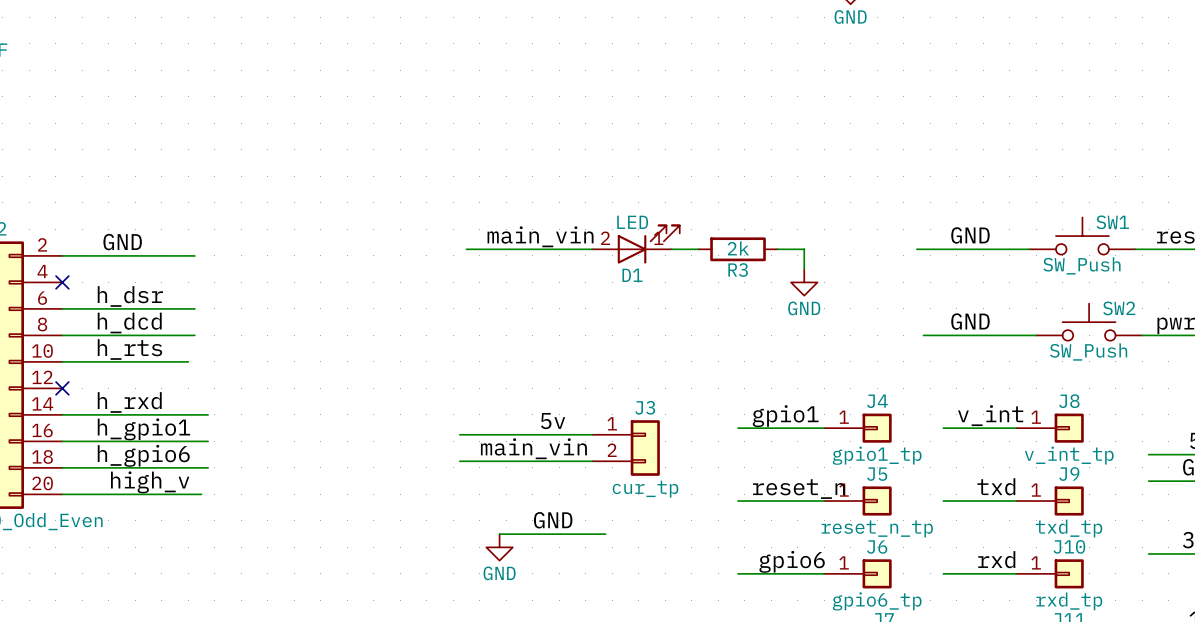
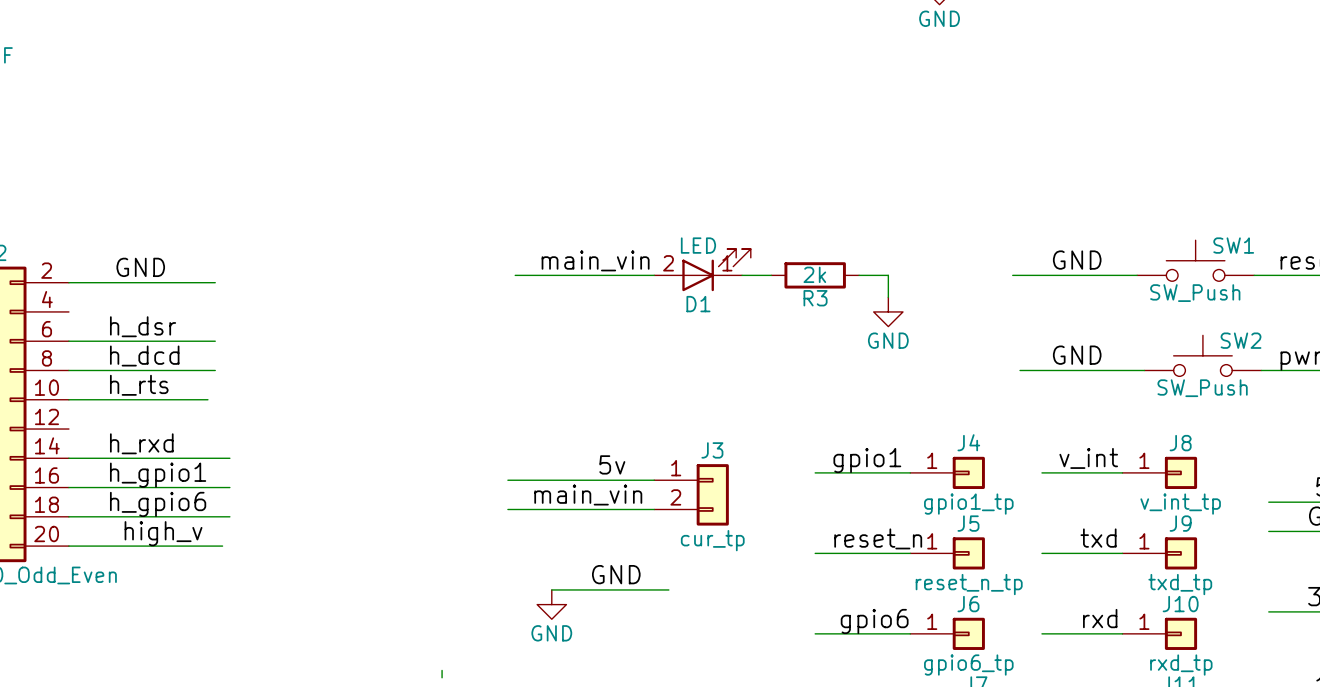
no-connect mark: (62, 282) -> none
no-connect mark: (62, 388) -> none
wire: none -> (442, 670) (442, 677)

